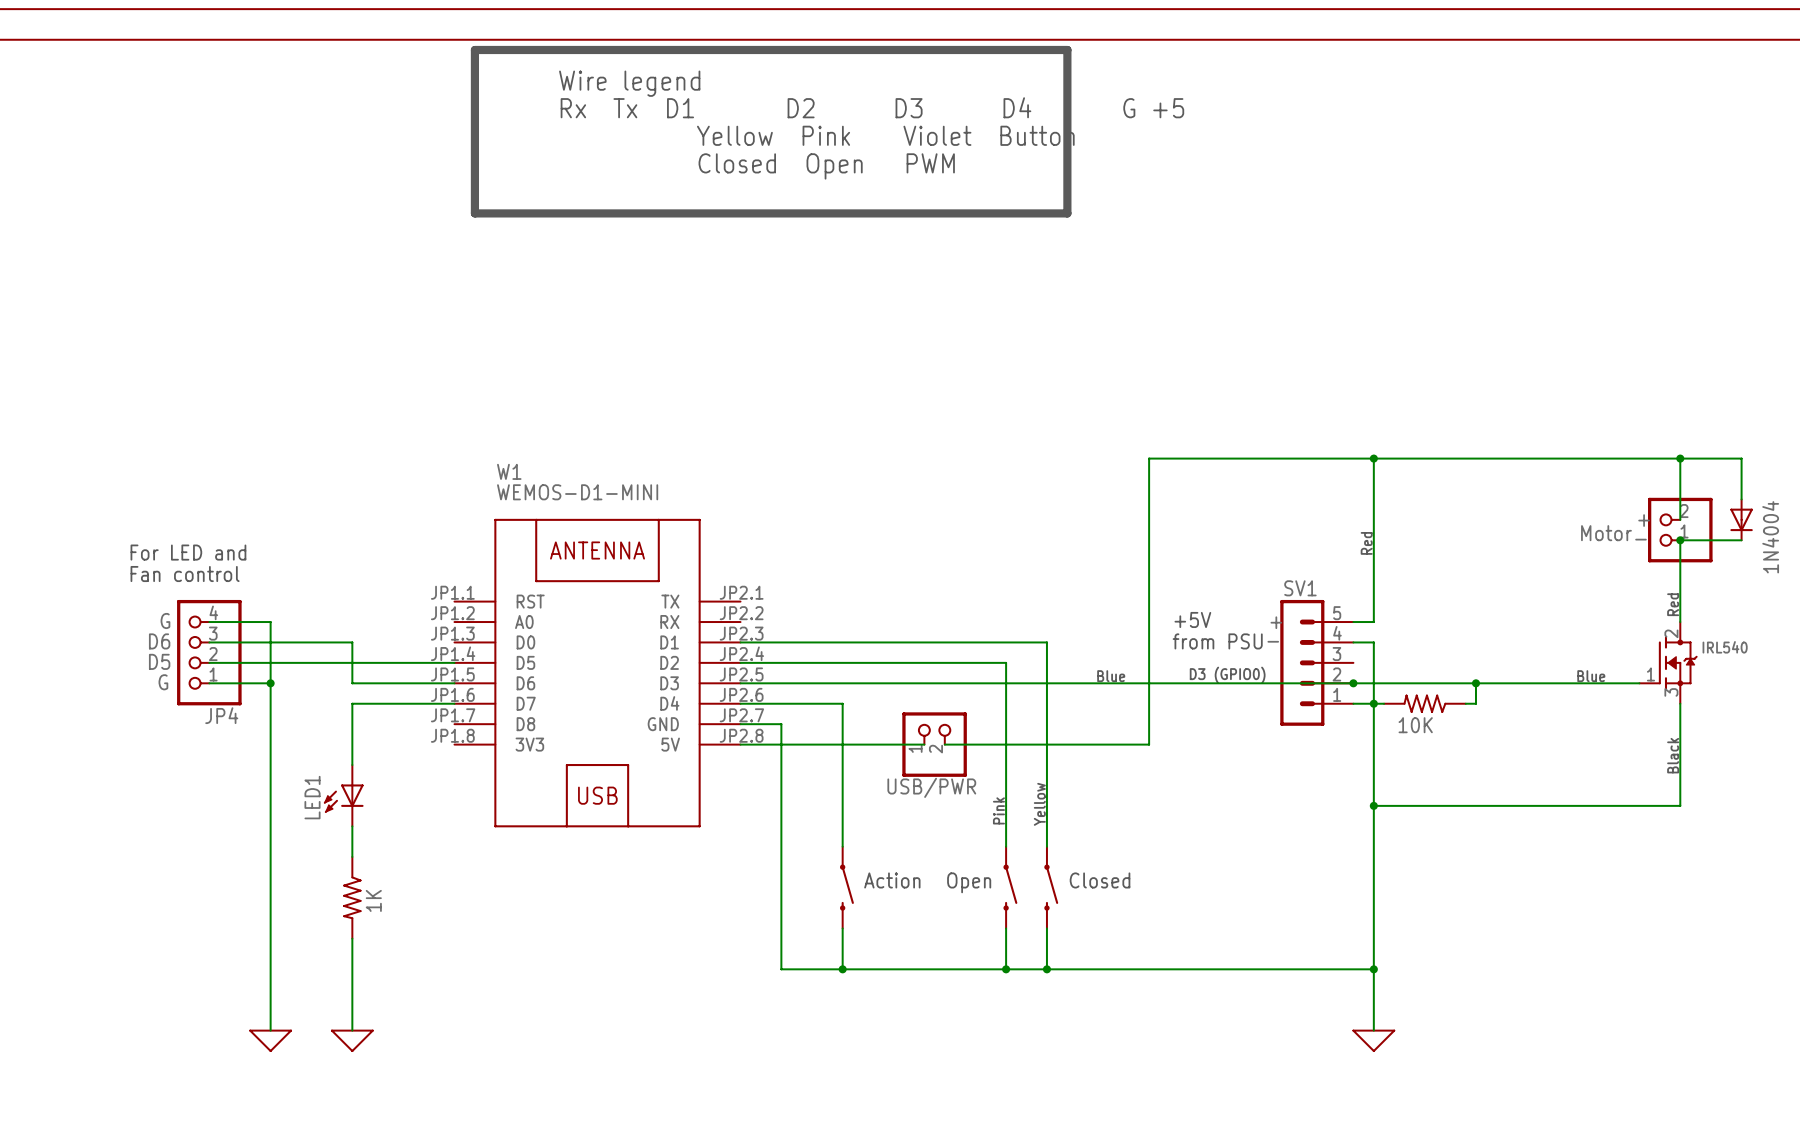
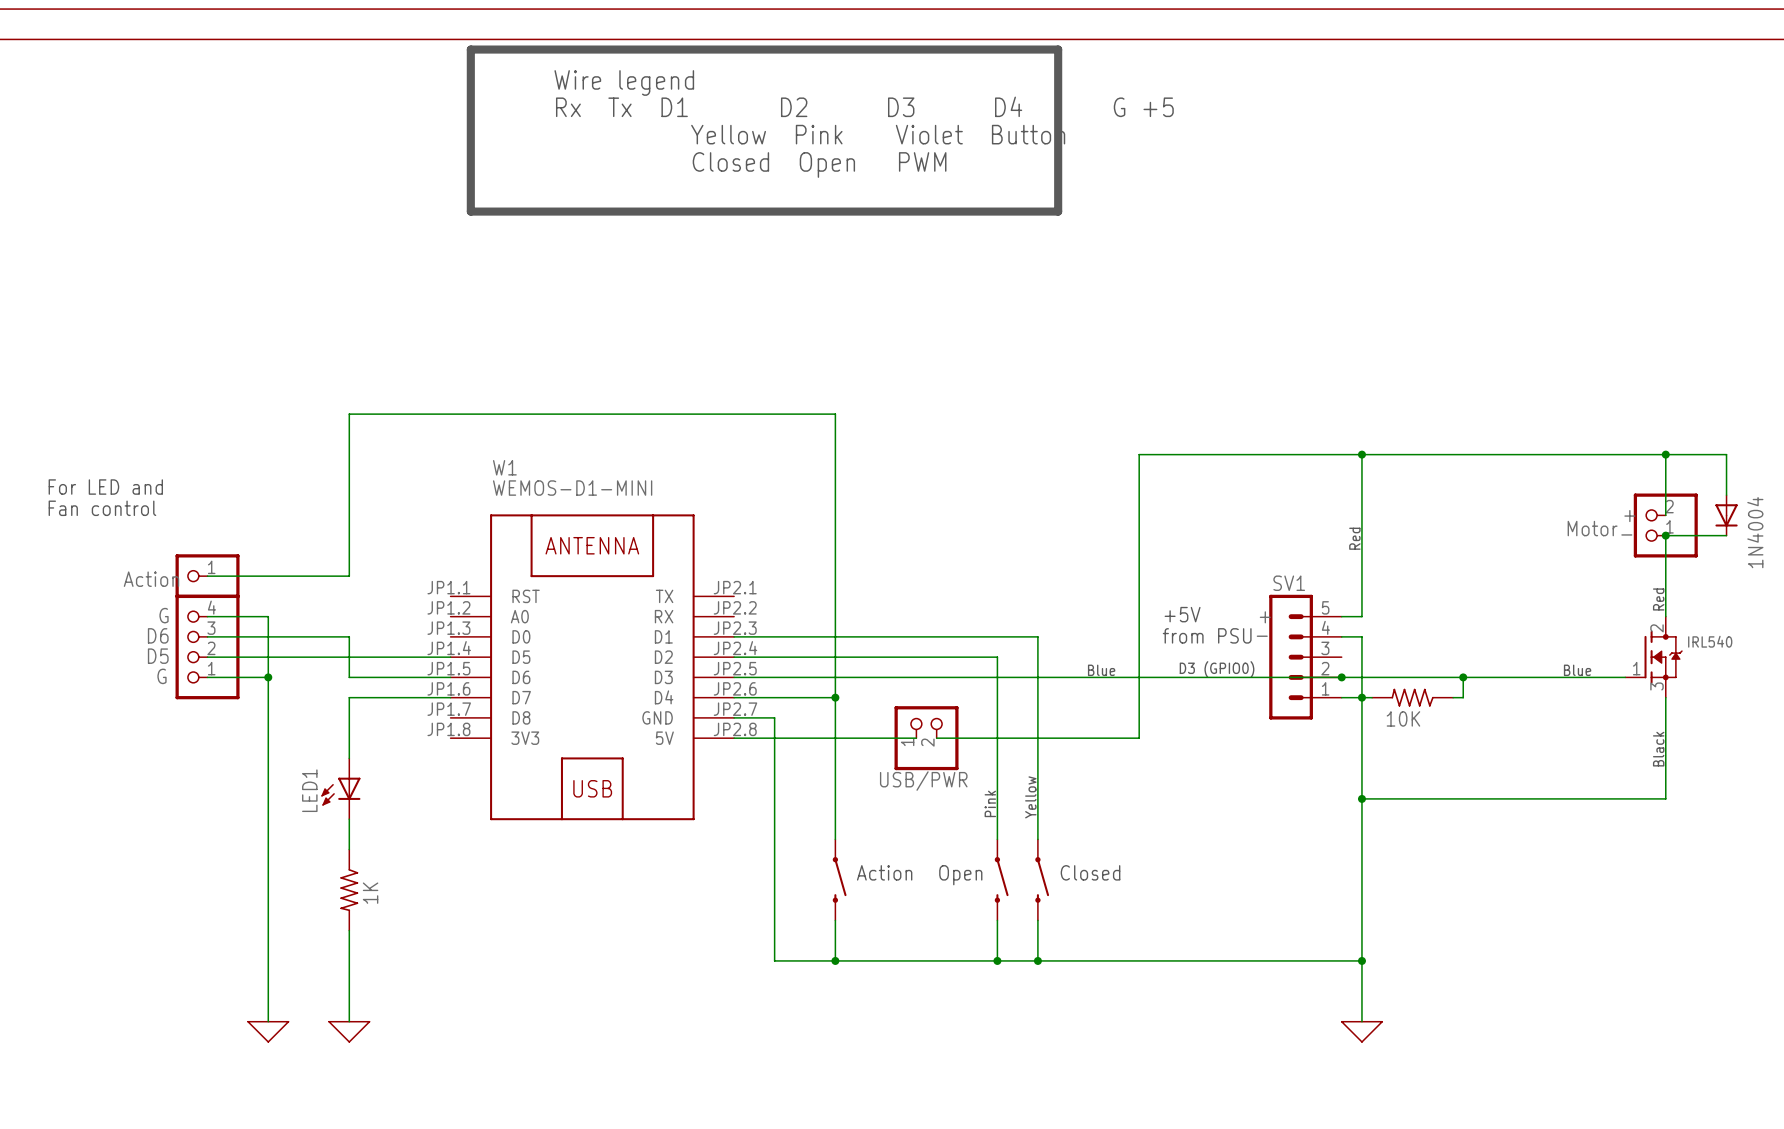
text position: For LED and (188, 552) -> For LED and (105, 487)
text position: Fan control (185, 574) -> Fan control (102, 508)
wire: none -> (207, 576) (349, 576) (349, 414) (835, 414) (835, 697)
part: none -> (207, 576)
text: none -> Action (151, 579)
junction: none -> (835, 697)
JP4 name: JP4 (221, 715) -> none

